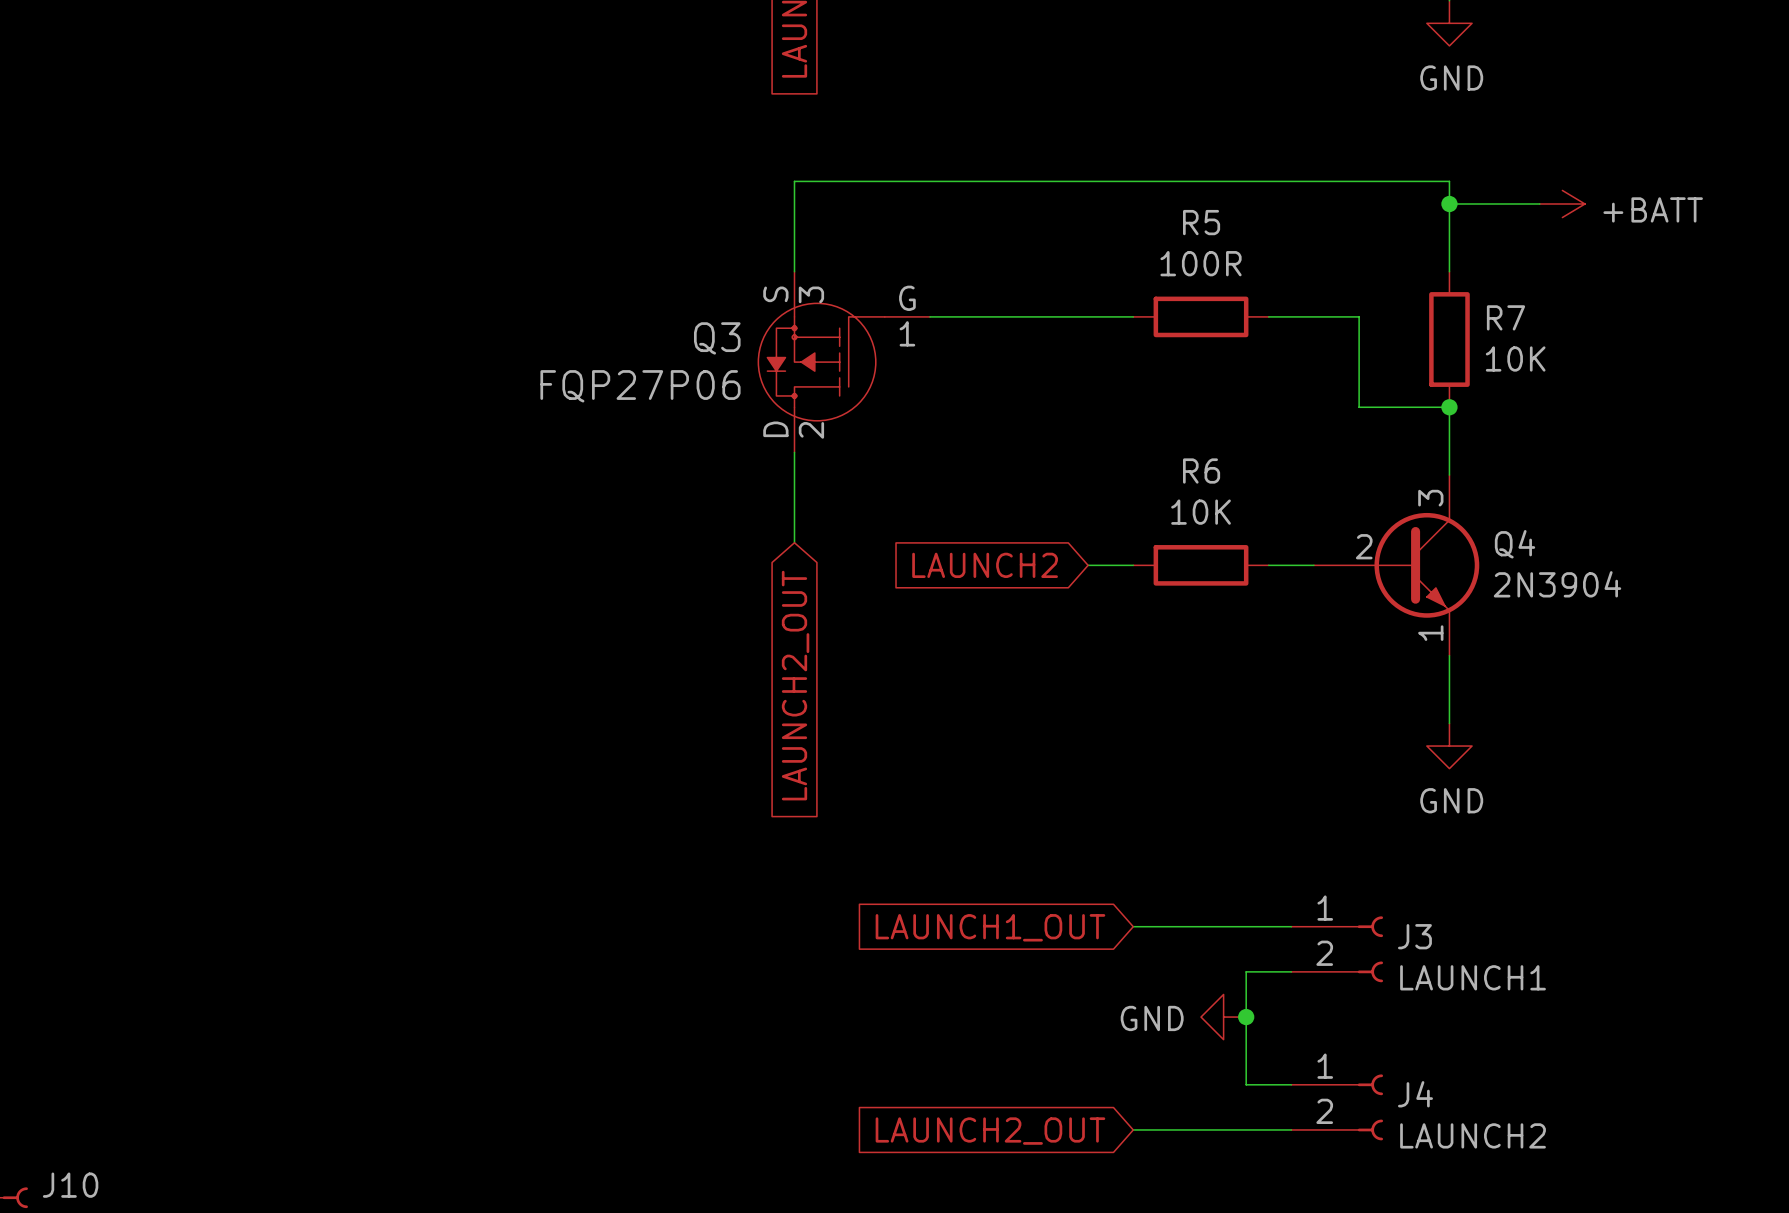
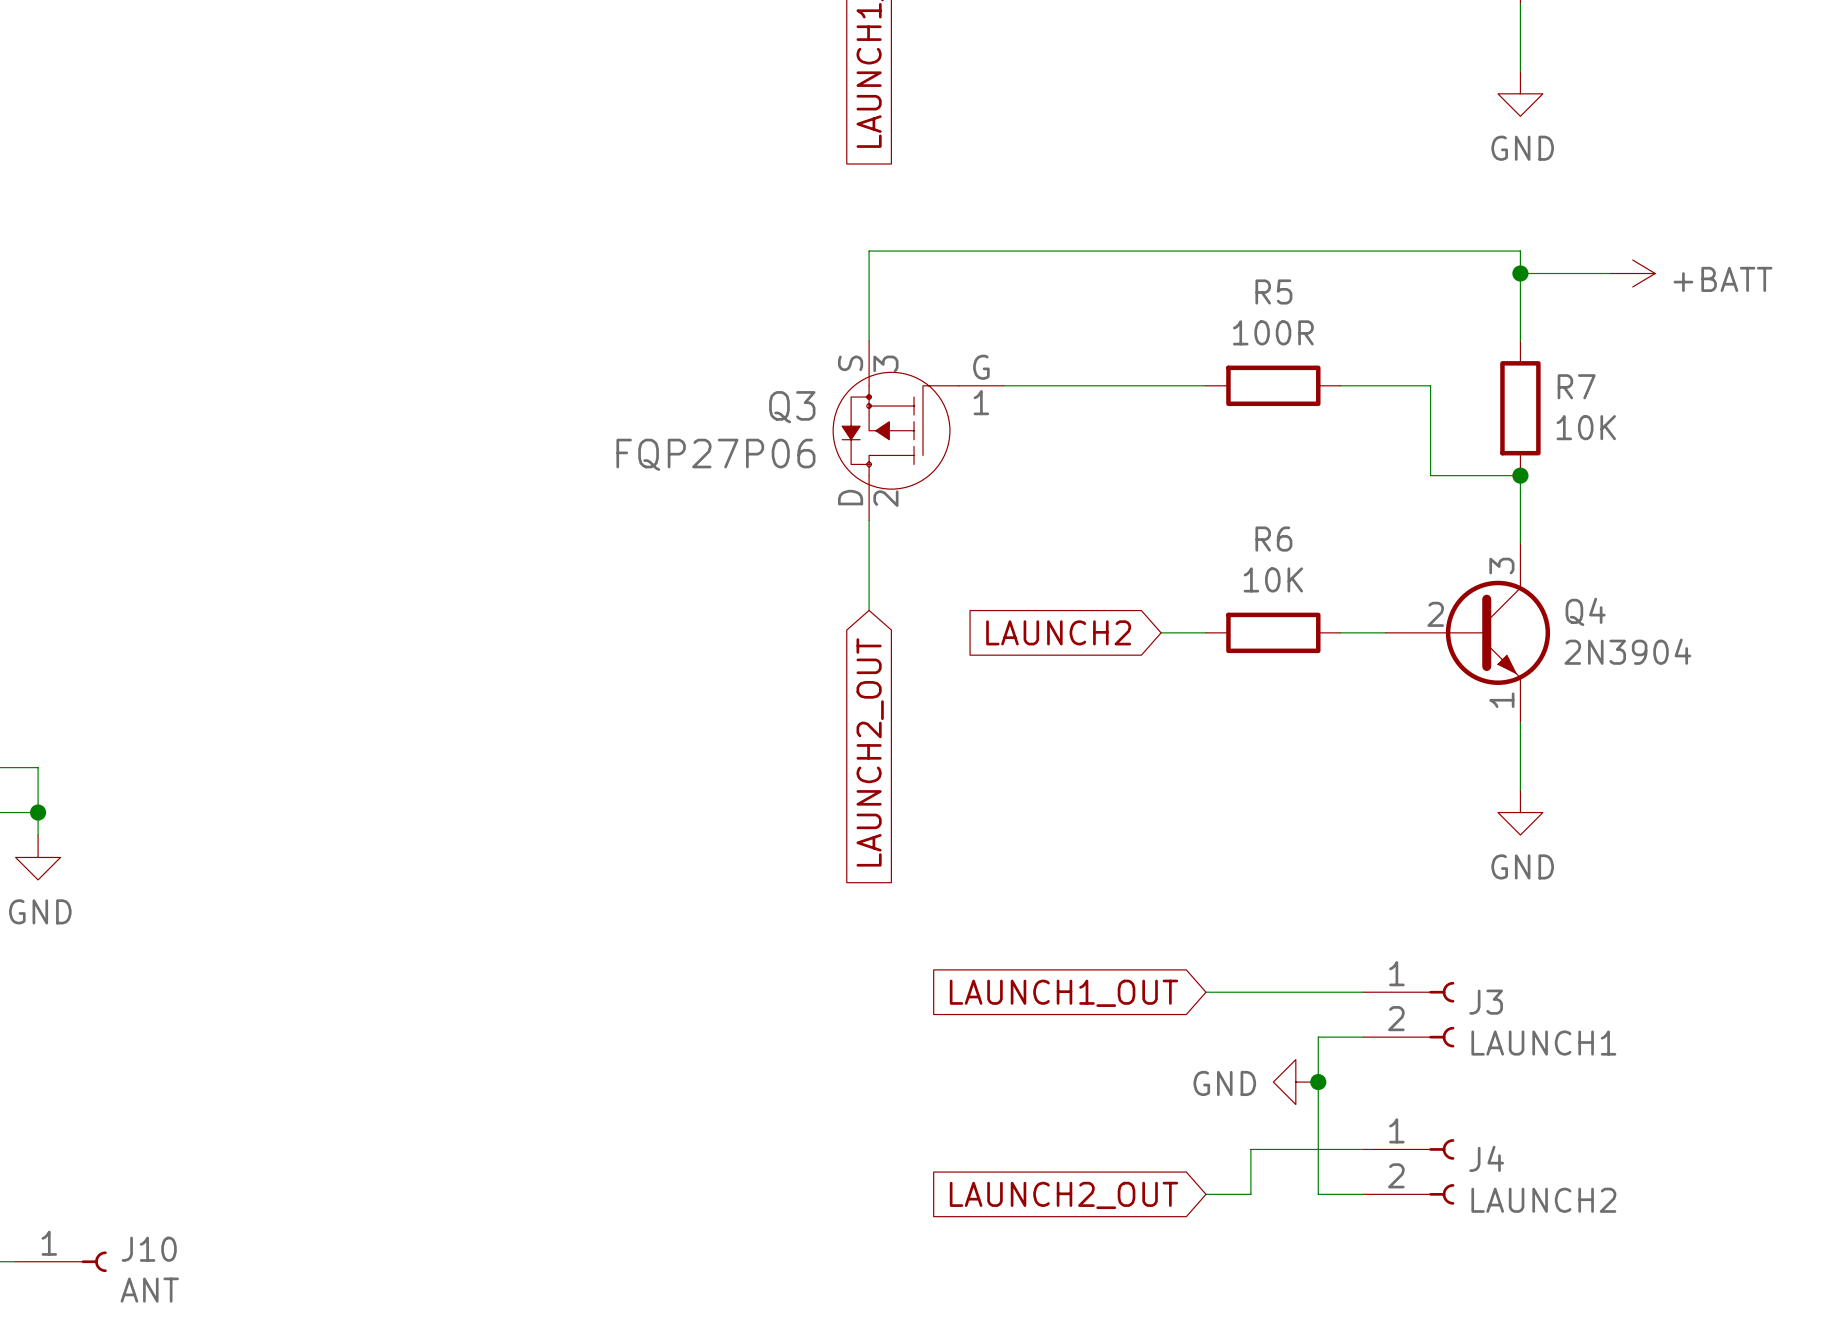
wire: (1178, 1129) (1246, 1129) -> (1250, 1194) (1250, 1149) (1318, 1149) (1318, 1194)

